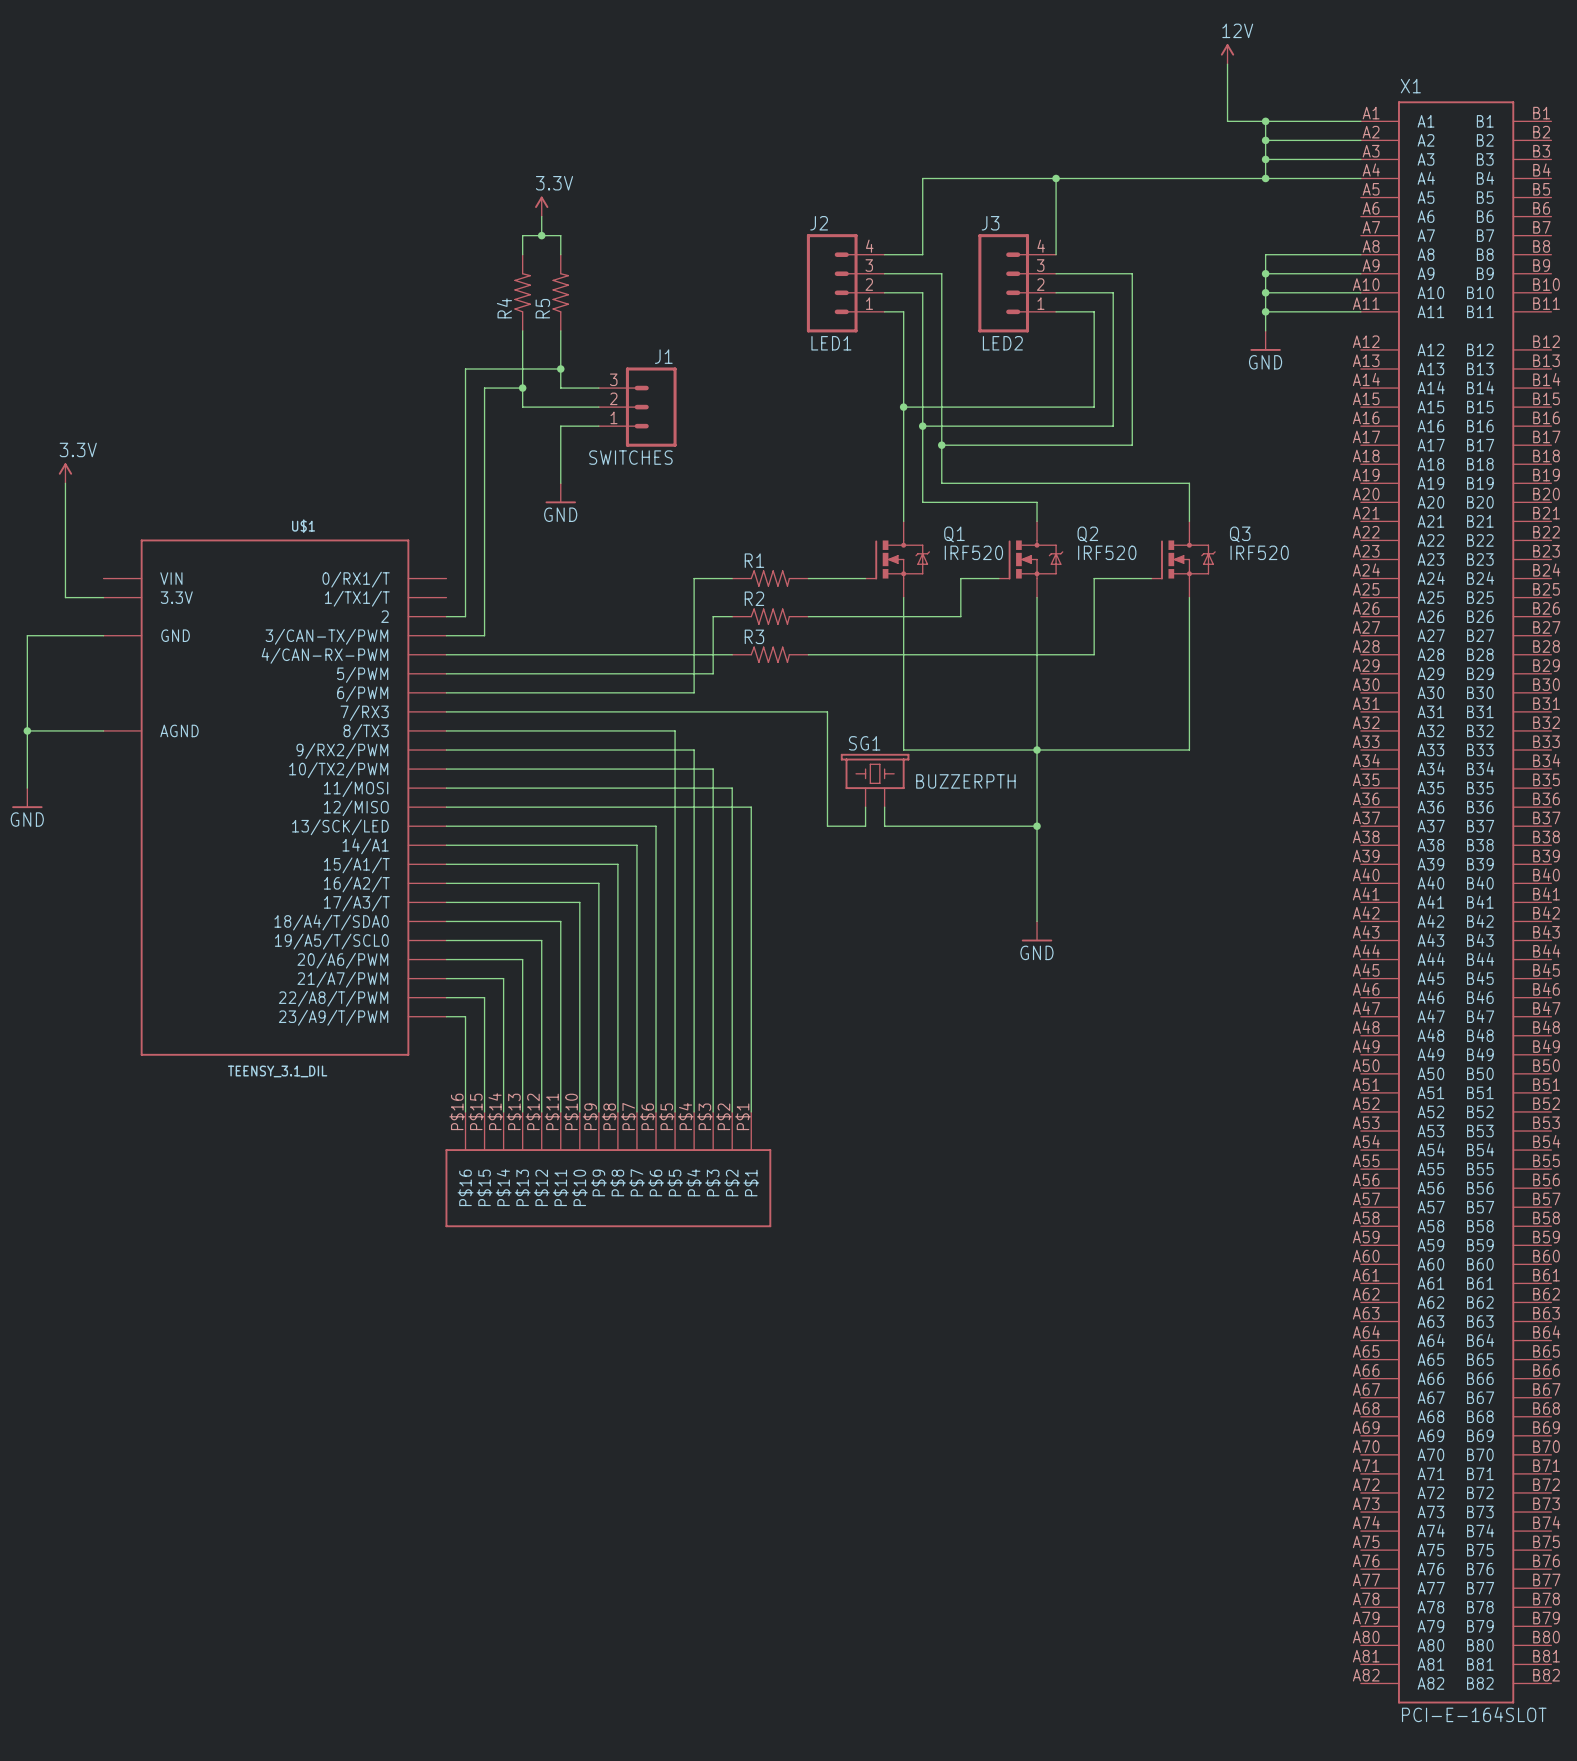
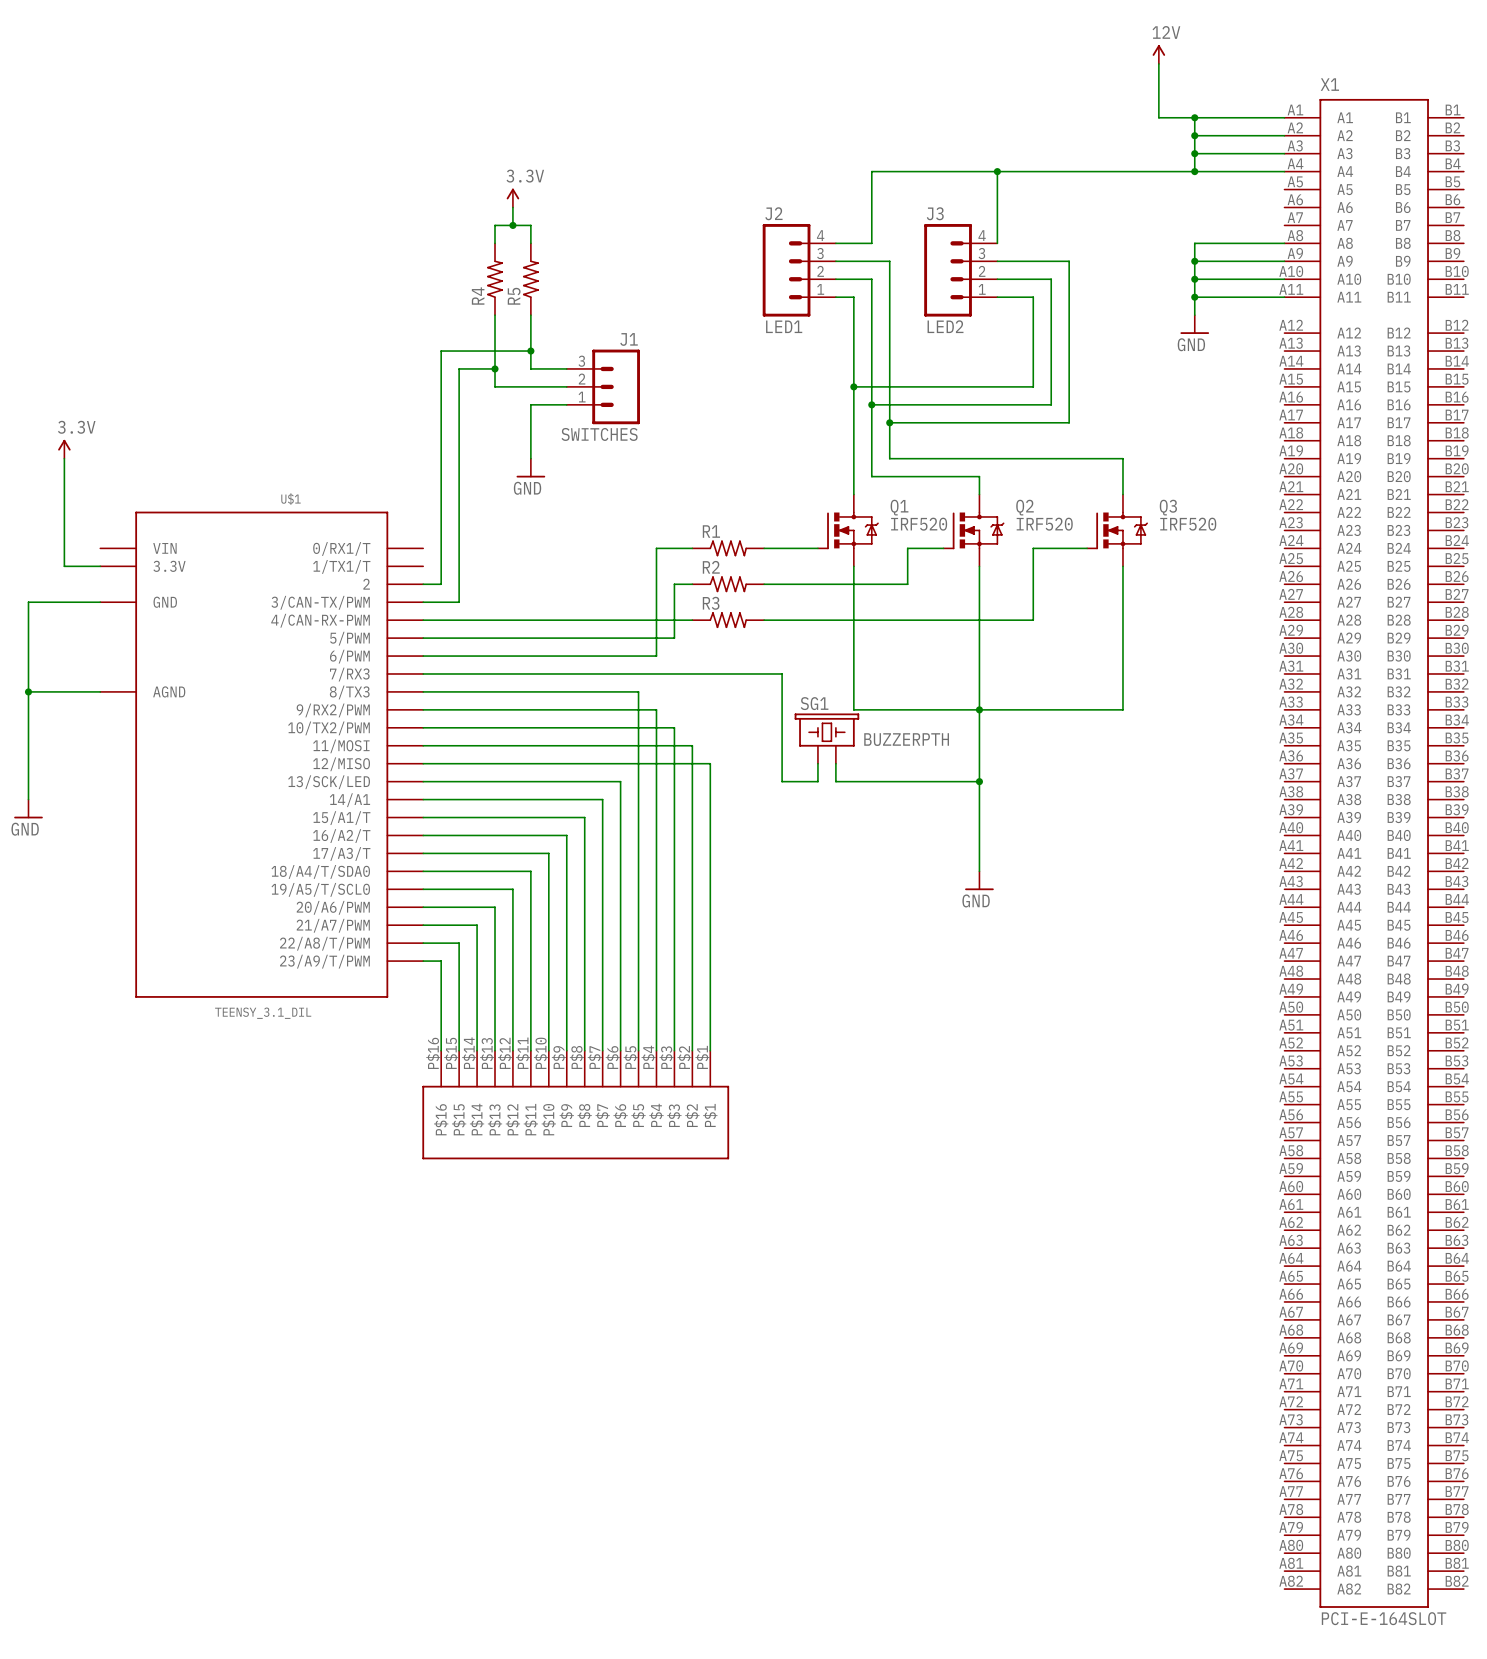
wire: none -> (28, 745) (28, 799)
power symbol position: GND (27, 798) -> GND (28, 809)

